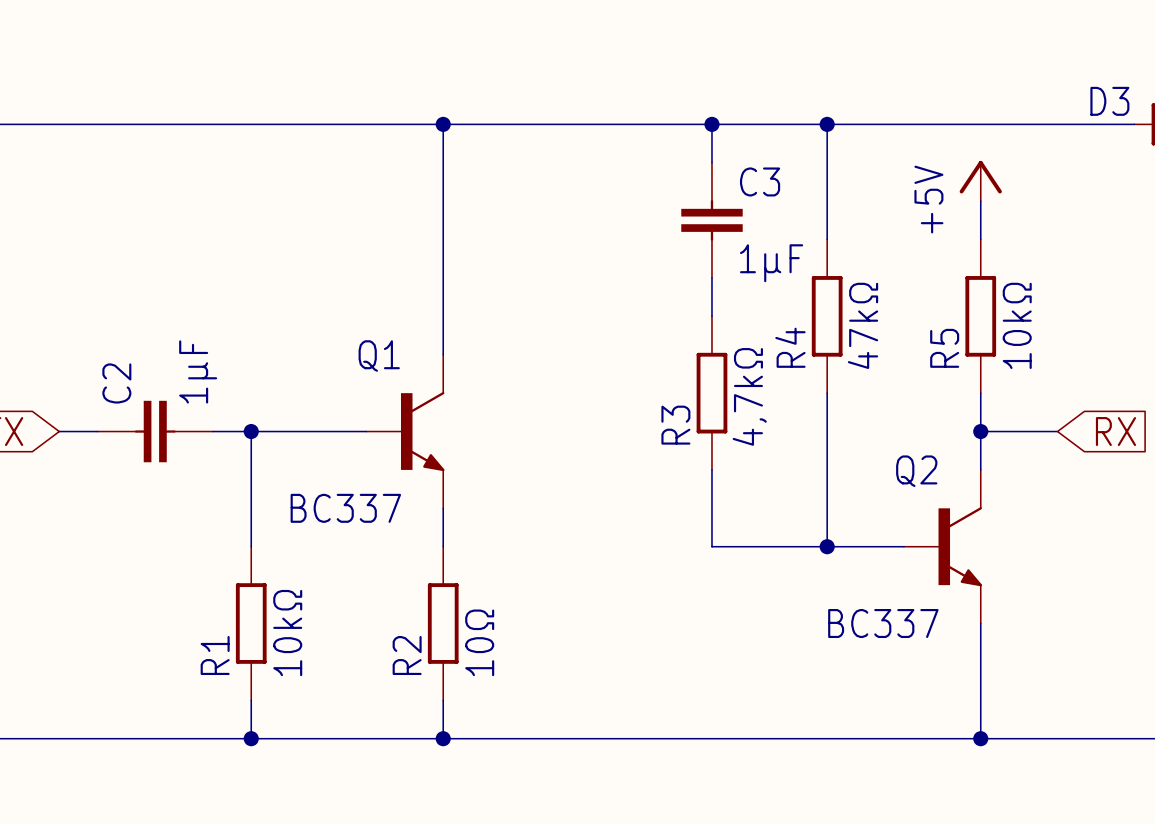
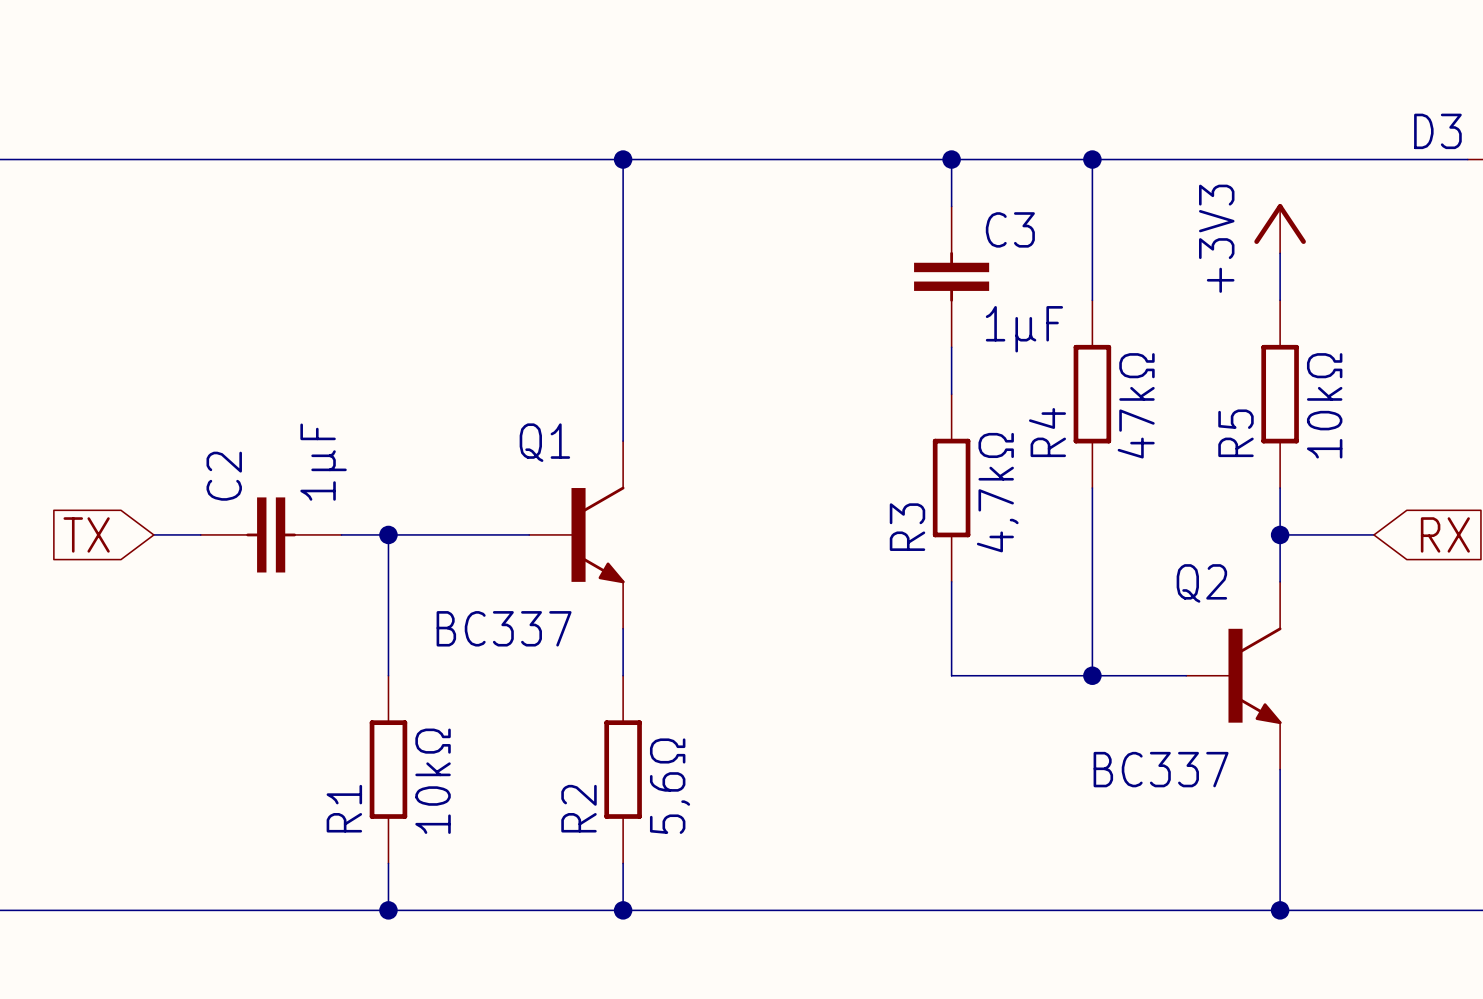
power symbol: +5V (980, 181) -> +3V3 (1280, 228)
R2 value: 10Ω (479, 642) -> 5,6Ω (670, 786)

